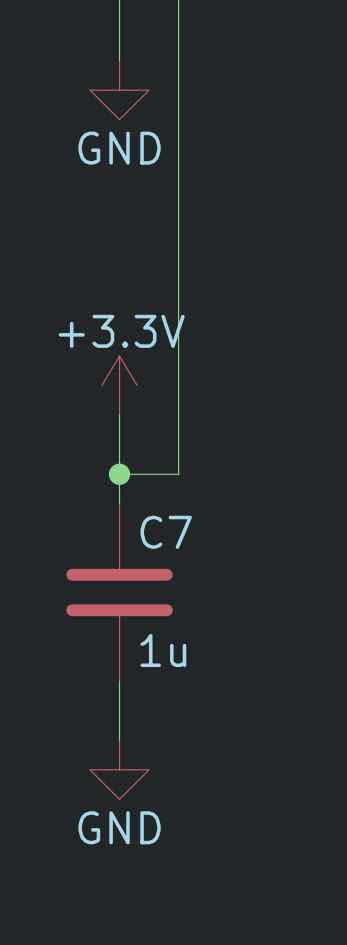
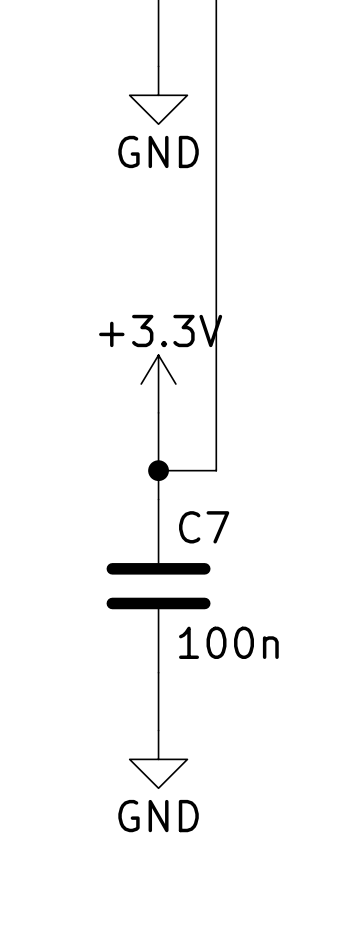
C7 value: 1u (163, 650) -> 100n (228, 642)

